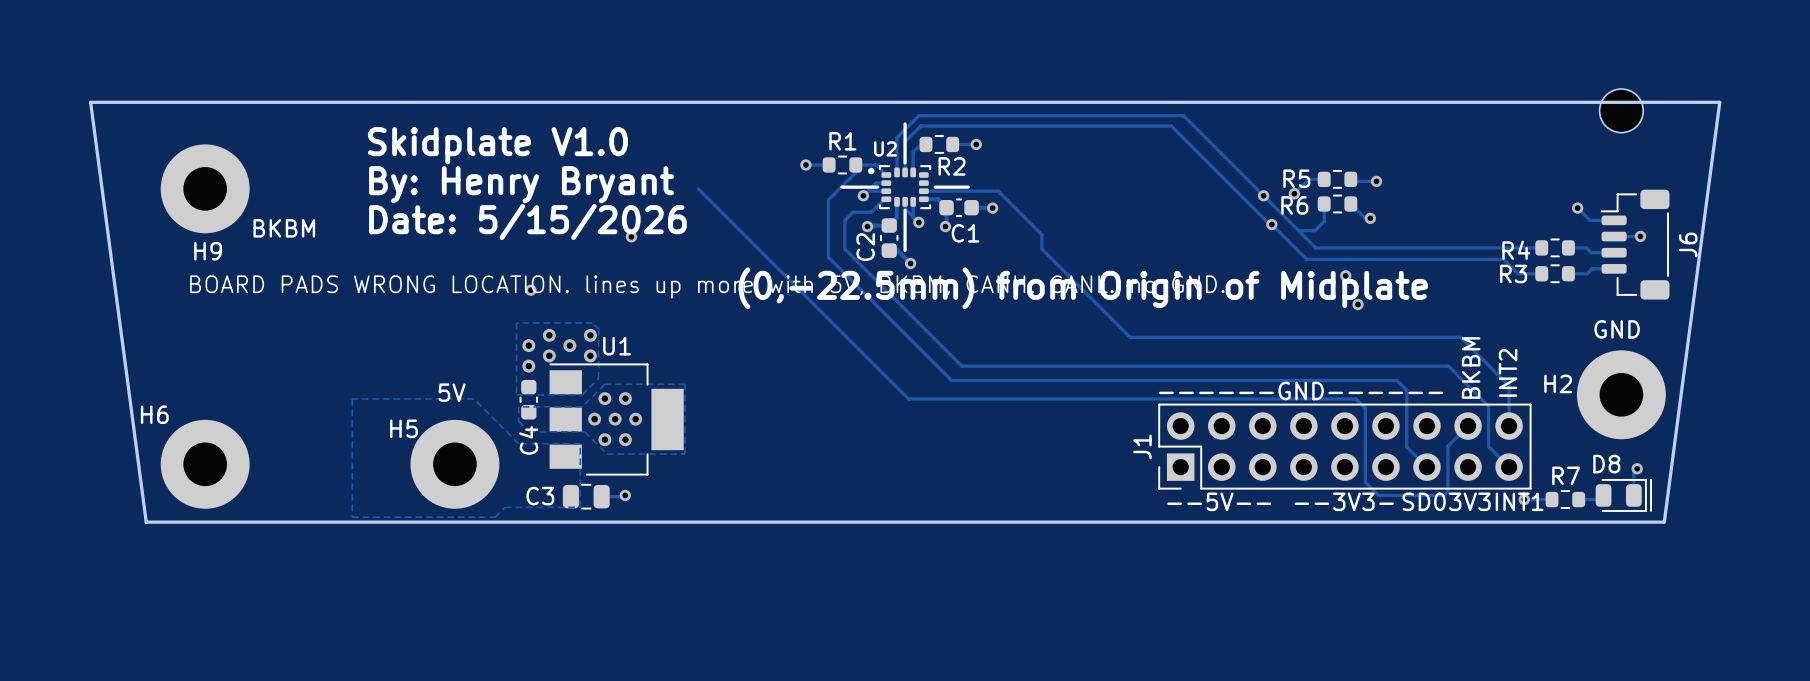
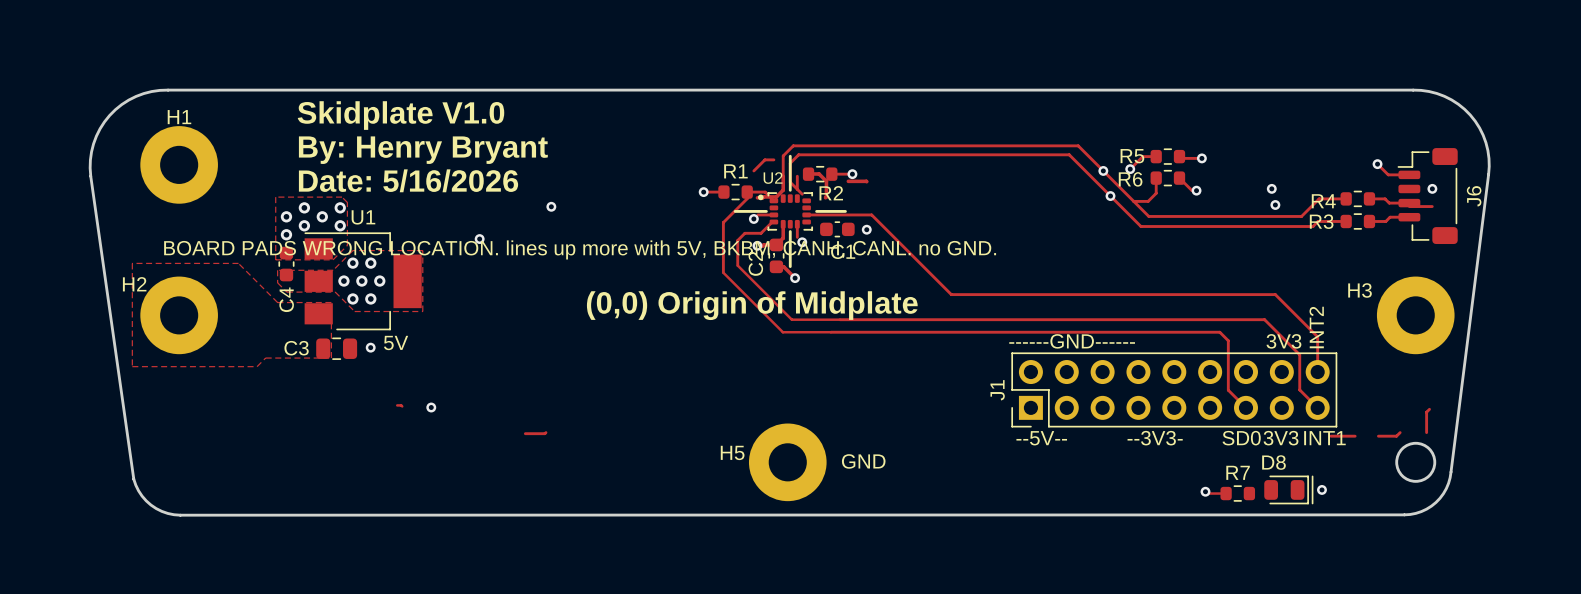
board edge: (90, 102) (146, 522) (1664, 522) (1719, 102) (90, 102) -> (168, 90) (151, 91) (136, 96) (121, 104) (109, 115) (100, 128) (93, 143) (90, 168) (133, 479) (138, 490) (146, 500) (156, 508) (167, 513) (180, 515) (1404, 514) (1421, 511) (1431, 506) (1443, 493) (1448, 483) (1488, 174) (1489, 158) (1483, 135) (1475, 121) (1458, 104) (1436, 93) (1413, 90) (168, 90)
part: (1621, 110) -> none
line: (905, 123) (905, 162) -> none
track: (925, 144) (920, 144) (913, 152) (913, 172) -> none
R2 position: (939, 144) -> (820, 174)
track: (952, 144) (976, 144) -> (831, 174) (852, 174)
via: (976, 144) -> none
text position: Skidplate V1.0 (497, 145) -> Skidplate V1.0 (400, 115)
track: (805, 164) (829, 164) -> (703, 192) (723, 192)
via: (805, 164) -> none
R1 position: (842, 164) -> (735, 192)
track: (1234, 167) (1183, 115) (918, 115) (897, 137) (897, 172) -> (1078, 145) (793, 145) (783, 155) (783, 176)
track: (905, 172) (905, 141) (920, 125) (1171, 125) (1269, 224) -> none
track: (886, 175) (876, 164) (855, 164) (855, 172) (828, 199) (828, 254) -> (773, 200) (765, 192) (747, 192) (747, 198) (723, 222)
line: none -> (790, 156) (790, 183)
text position: By: Henry Bryant (521, 184) -> By: Henry Bryant (423, 150)
line: (841, 187) (877, 187) -> (735, 211) (766, 211)
U2 position: (899, 187) -> (785, 211)
line: (935, 187) (968, 187) -> (816, 211) (845, 211)
track: (698, 188) (908, 398) (1355, 398) (1365, 408) (1365, 482) (1378, 495) (1444, 495) (1447, 491) (1447, 446) (1468, 426) -> none
track: (867, 191) (886, 191) -> (757, 214) (773, 214)
track: (923, 191) (998, 191) (1041, 234) (1041, 249) (1130, 337) -> (806, 214) (871, 214) (951, 294) (986, 294)
via: (863, 195) -> none
track: (886, 199) (871, 212) (853, 212) (844, 220) (844, 249) (961, 366) -> (773, 222) (761, 233) (744, 233) (737, 240) (737, 265) (791, 319) (839, 319)
track: none -> (790, 176) (790, 163) (798, 154) (1069, 154) (1110, 196)
C1 position: (959, 207) -> (837, 229)
via position: (992, 208) -> (852, 174)
track: (1577, 208) (1589, 220) (1614, 220) -> (1377, 164) (1388, 174) (1409, 174)
via position: (1577, 208) -> (1377, 164)
via: none -> (1271, 188)
line: (905, 217) (905, 250) -> none
via: none -> (703, 192)
text: Date: 5/15/2026 (527, 221) -> Date: 5/16/2026 (408, 180)
via: (918, 222) -> none
via: (867, 226) -> none
via: (945, 226) -> none
text: BKBM (284, 228) -> none
via: none -> (1275, 204)
via position: (1640, 236) -> (1432, 188)
via: none -> (304, 207)
via: none -> (340, 207)
C2 position: (889, 238) -> (776, 255)
J6 position: (1635, 244) -> (1427, 196)
track: (1490, 247) (1541, 247) -> (1301, 216) (1319, 198) (1346, 198)
R4 position: (1555, 247) -> (1357, 198)
track: (1568, 247) (1586, 247) (1591, 252) (1614, 252) -> (1369, 198) (1385, 198) (1389, 203) (1409, 203)
via: none -> (286, 216)
via: none -> (322, 216)
via: none -> (753, 218)
track: (889, 250) (897, 250) (910, 263) -> (776, 266) (783, 266) (795, 278)
H9 name: H9 (208, 251) -> H1 (179, 117)
track: none -> (783, 224) (783, 238) (776, 244) (757, 245)
track: none -> (797, 224) (797, 237)
track: (828, 257) (951, 380) -> (723, 224) (723, 272) (782, 332) (830, 332)
via: none -> (304, 225)
via: none -> (340, 225)
track: (1503, 259) (1518, 273) (1541, 273) -> (1313, 226) (1318, 221) (1346, 221)
via position: (910, 263) -> (802, 242)
via: none -> (866, 229)
line: none -> (790, 231) (790, 266)
via: none -> (286, 234)
track: (1614, 268) (1592, 268) (1587, 273) (1568, 273) -> (1409, 217) (1390, 217) (1385, 221) (1369, 221)
R3 position: (1555, 273) -> (1357, 221)
via: (1345, 275) -> none
via: none -> (757, 245)
text: (0,-22.5mm) from Origin of Midplate (1083, 288) -> none
via position: (530, 290) -> (479, 239)
via: none -> (352, 263)
via: none -> (370, 263)
via: (1358, 304) -> none
via: none -> (795, 278)
via: none -> (343, 281)
via: none -> (361, 281)
via: none -> (379, 281)
zone outline: (516, 323) (516, 394) (582, 394) (598, 378) (598, 329) (592, 323) (516, 323) -> (275, 197) (275, 259) (333, 259) (347, 245) (347, 202) (342, 197) (275, 197)
text: GND (1617, 329) -> none
via: (549, 335) -> none
via: (590, 335) -> none
via: none -> (352, 298)
via: none -> (370, 298)
via: (528, 345) -> none
via: (569, 345) -> none
text: none -> (0,0) Origin of Midplate (752, 305)
via: (549, 355) -> none
via: (590, 355) -> none
H3: none -> (1415, 315)
via: (528, 366) -> none
text: BKBM (1471, 368) -> 3V3 (1283, 341)
H2 name position: H2 (1558, 383) -> H2 (134, 284)
zone outline: (604, 384) (684, 384) (684, 454) (606, 454) (584, 431) (529, 431) (518, 421) (518, 406) (582, 406) (604, 384) -> (352, 250) (422, 250) (422, 311) (354, 311) (335, 292) (286, 292) (277, 282) (277, 270) (333, 270) (352, 250)
H2 position: (1621, 394) -> (179, 315)
zone outline: (352, 398) (352, 517) (495, 517) (505, 507) (580, 507) (580, 443) (518, 443) (473, 398) (352, 398) -> (132, 263) (132, 366) (257, 366) (265, 358) (331, 358) (331, 302) (277, 302) (238, 263) (132, 263)
via: none -> (370, 347)
via: (604, 398) -> none
via: (625, 398) -> none
C4 position: (528, 399) -> (286, 264)
via: (594, 419) -> none
via: (615, 419) -> none
U1 position: (616, 419) -> (363, 281)
via: (635, 419) -> none
H5 name position: H5 (404, 428) -> H5 (732, 452)
via: (604, 439) -> none
via: (625, 439) -> none
H6: (205, 464) -> none
H5 position: (454, 464) -> (787, 462)
via: none -> (431, 407)
via: (1637, 468) -> none
via: (625, 495) -> none
D8 position: (1623, 495) -> (1288, 489)
C3 position: (586, 496) -> (336, 348)
via position: (1524, 499) -> (1321, 489)
R7 position: (1565, 499) -> (1237, 493)
round board edge: none -> [1395, 441, 1437, 483]
text: none -> GND (863, 461)
track: none -> (1205, 491) (1207, 493) (1226, 493)
via: none -> (1205, 491)

